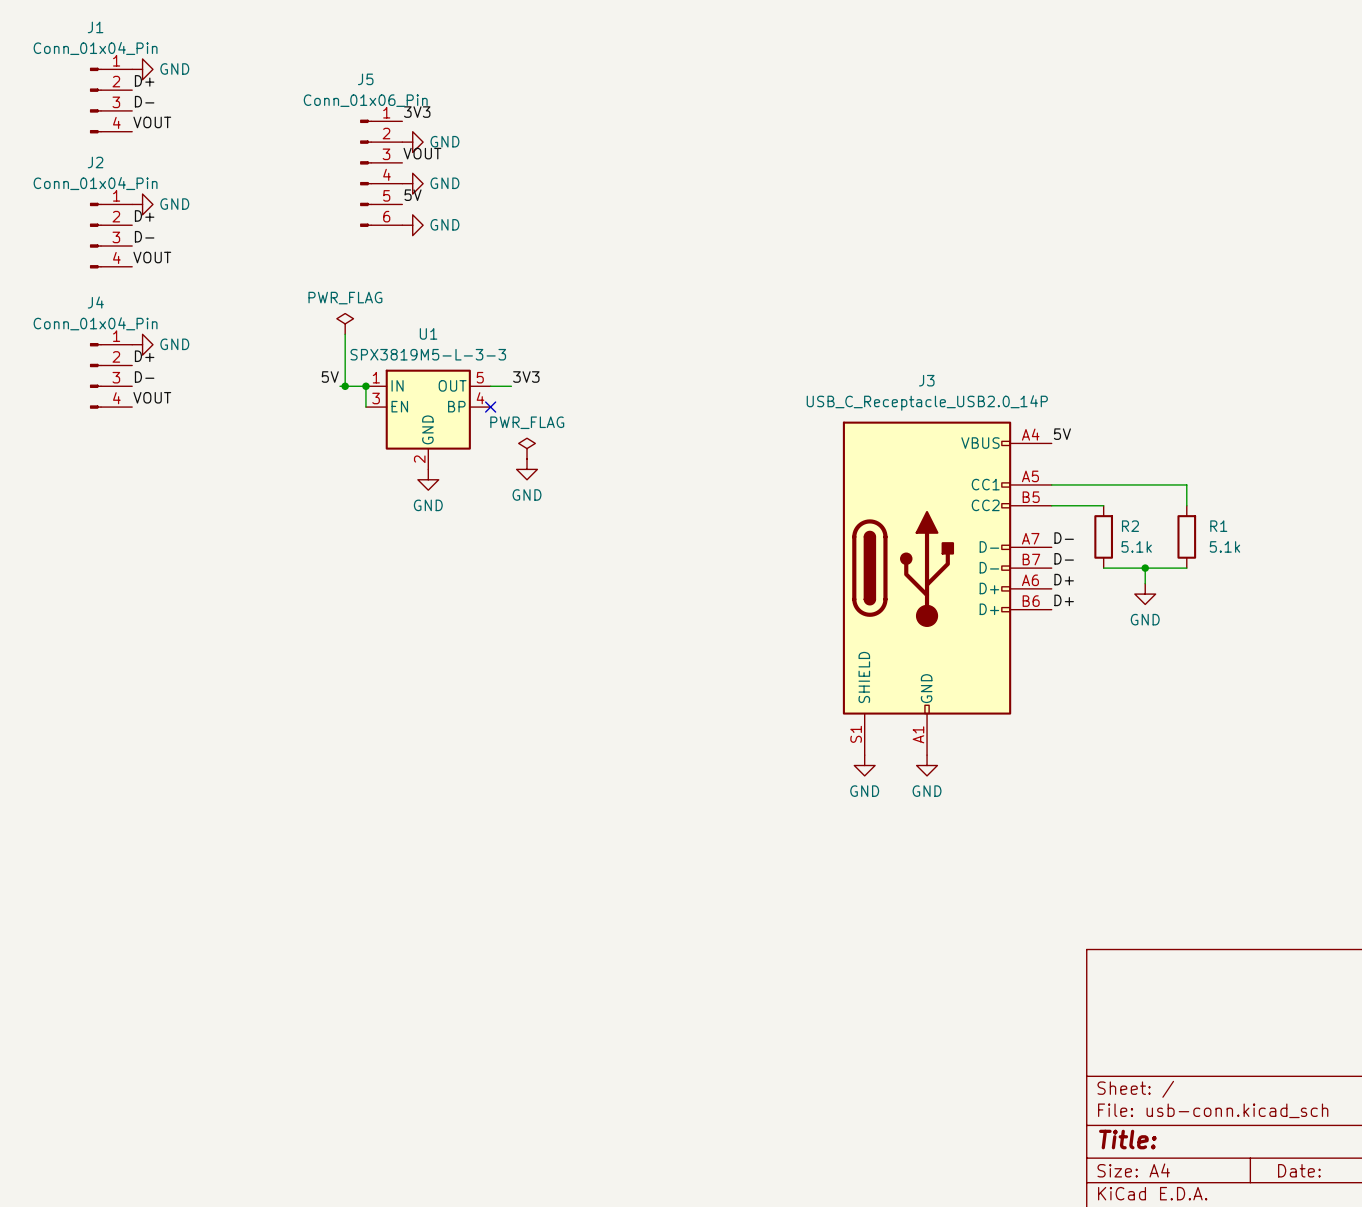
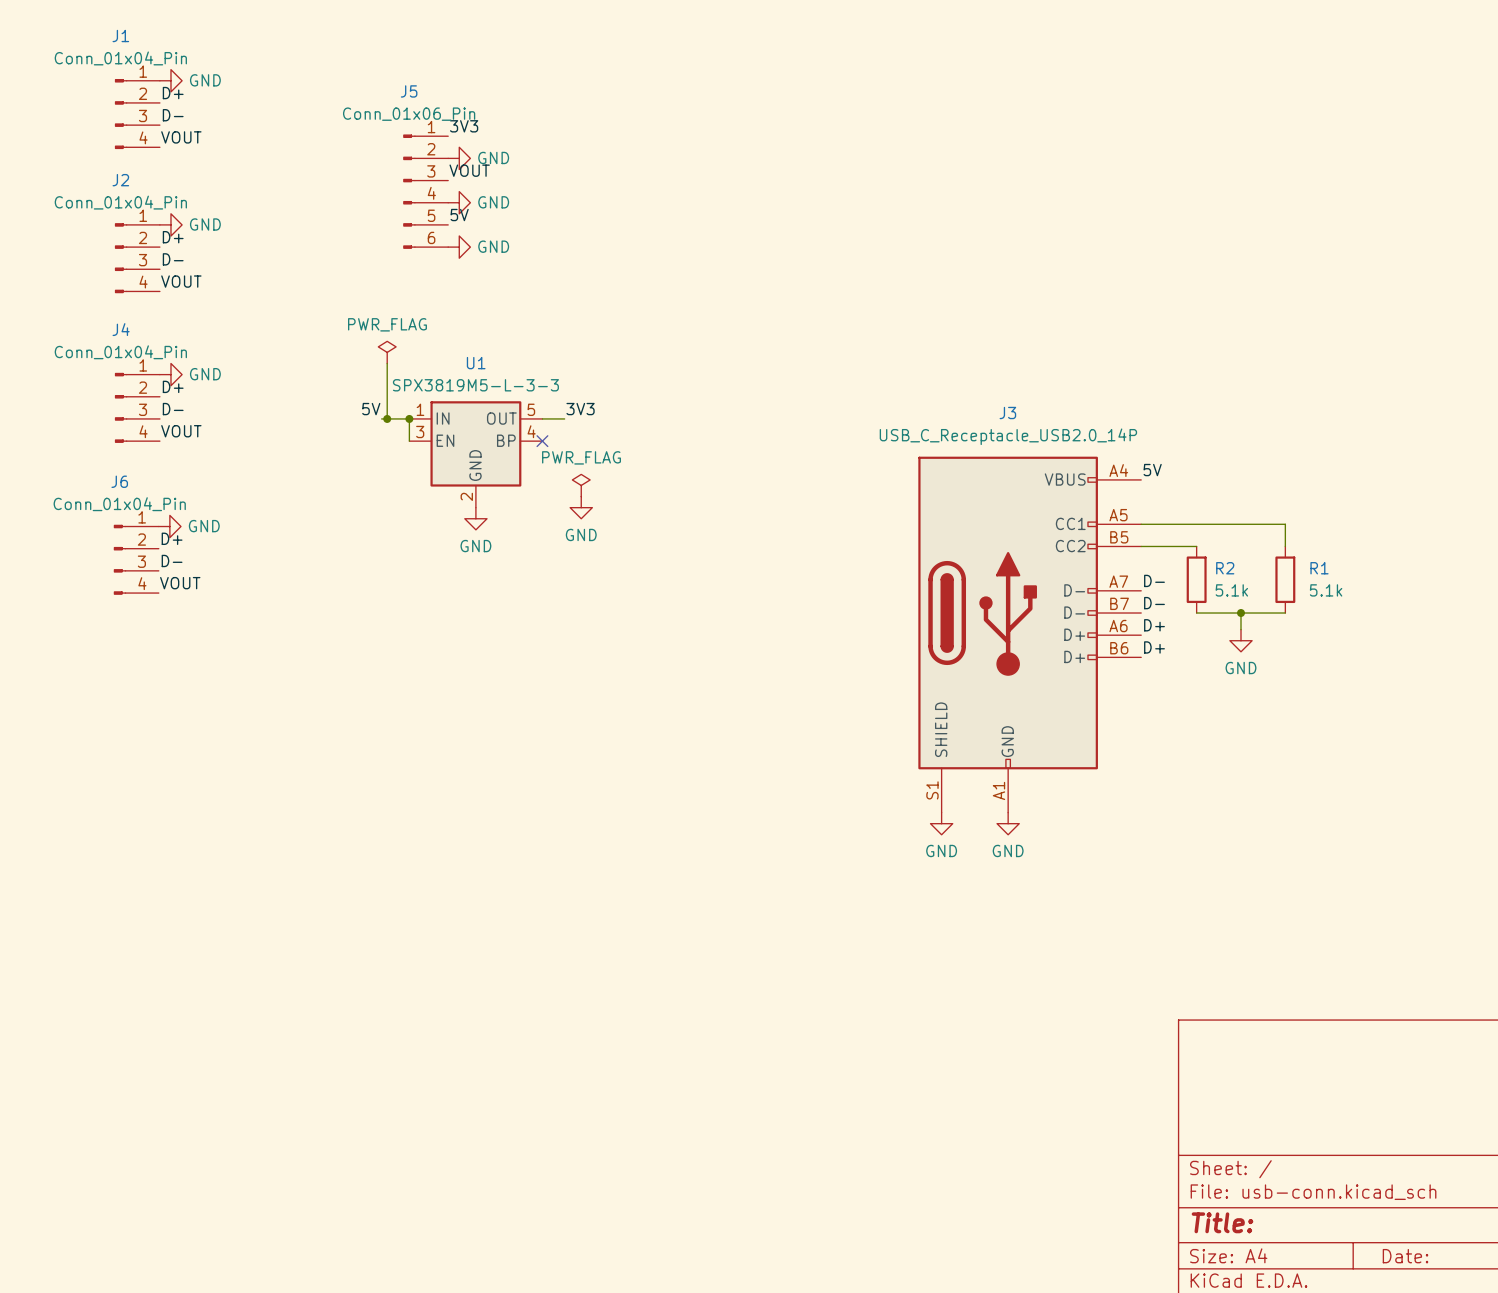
power symbol: none -> GND (169, 526)
label: none -> D+ (172, 538)
J6: none -> Conn_01x04_Pin (136, 559)
label: none -> D- (172, 560)
label: none -> VOUT (180, 583)

